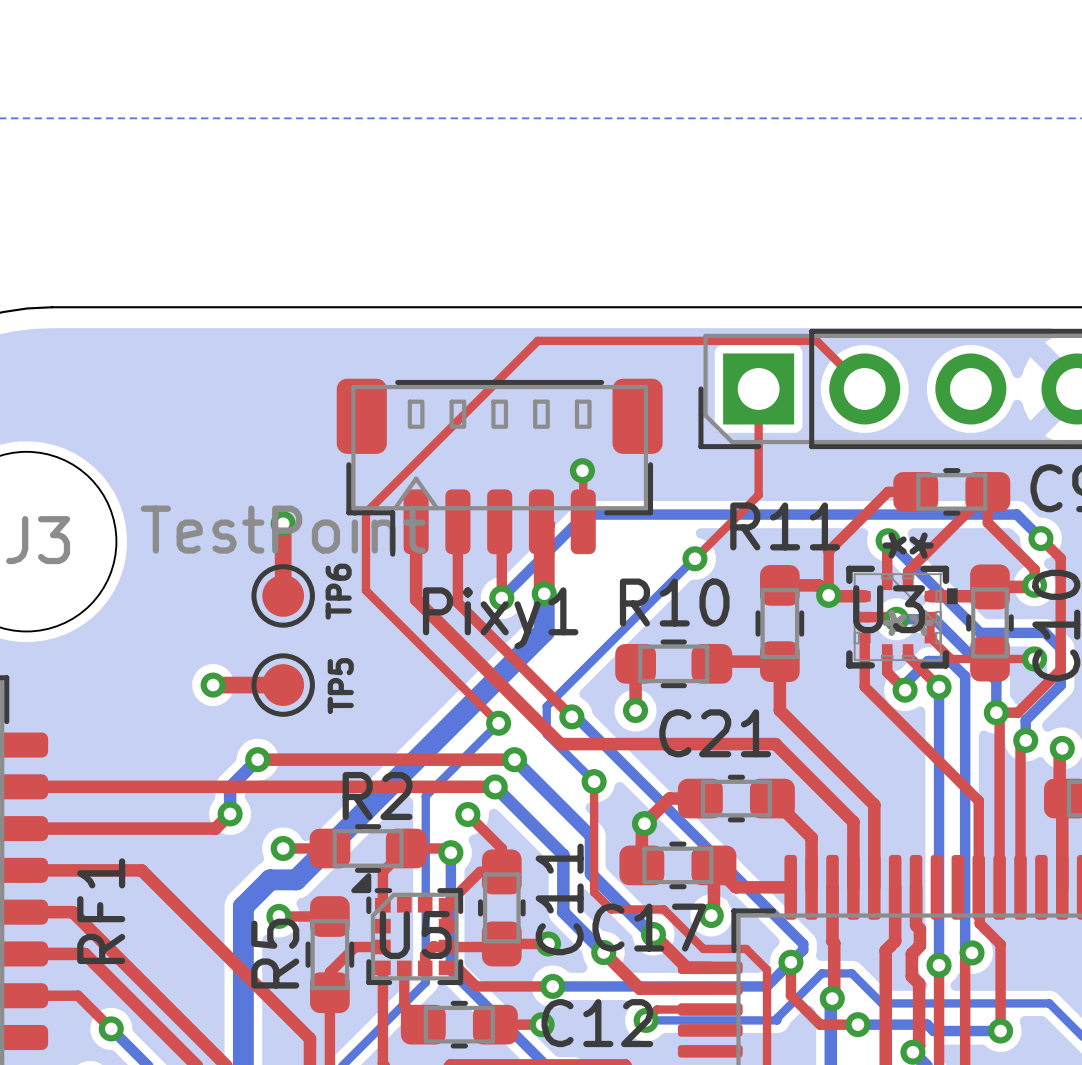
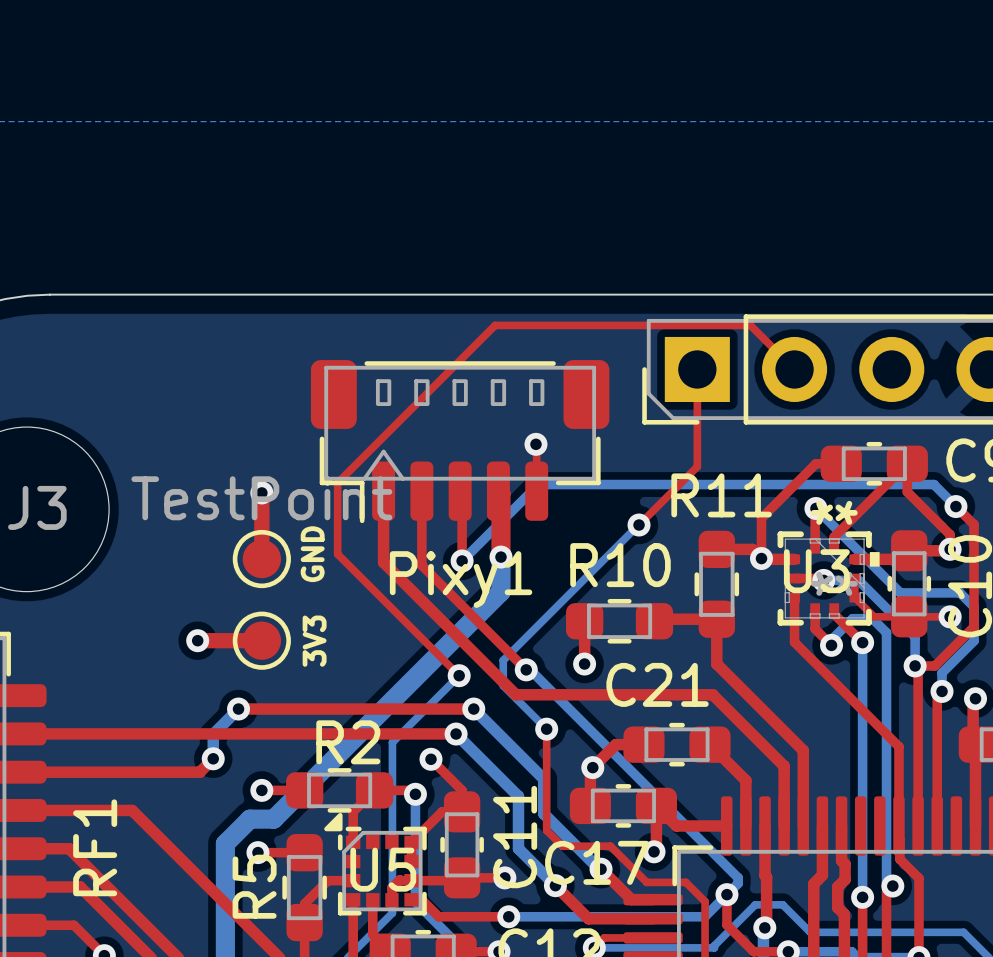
TP6 name: TP6 (338, 591) -> GND (312, 554)
TP5 name: TP5 (340, 686) -> 3V3 (314, 641)

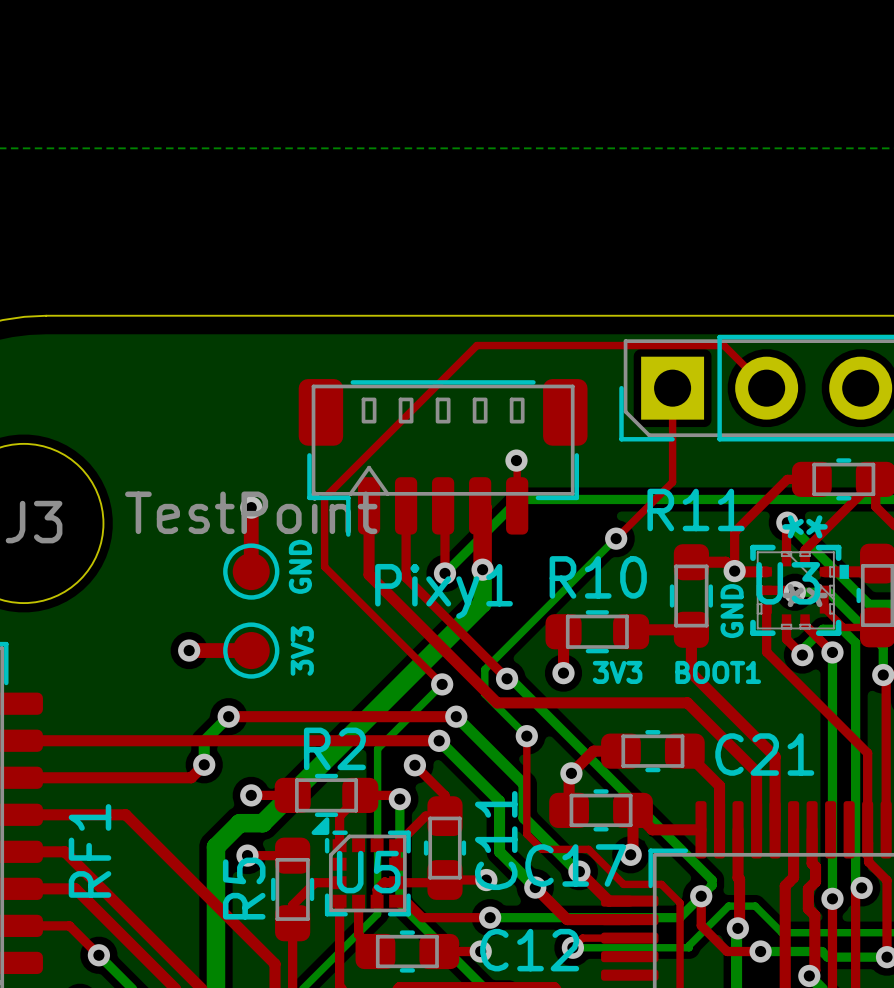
text: none -> GND (732, 611)
text: none -> 3V3 (617, 672)
text: none -> BOOT1 (718, 672)
C21 name position: C21 (657, 684) -> C21 (764, 754)

